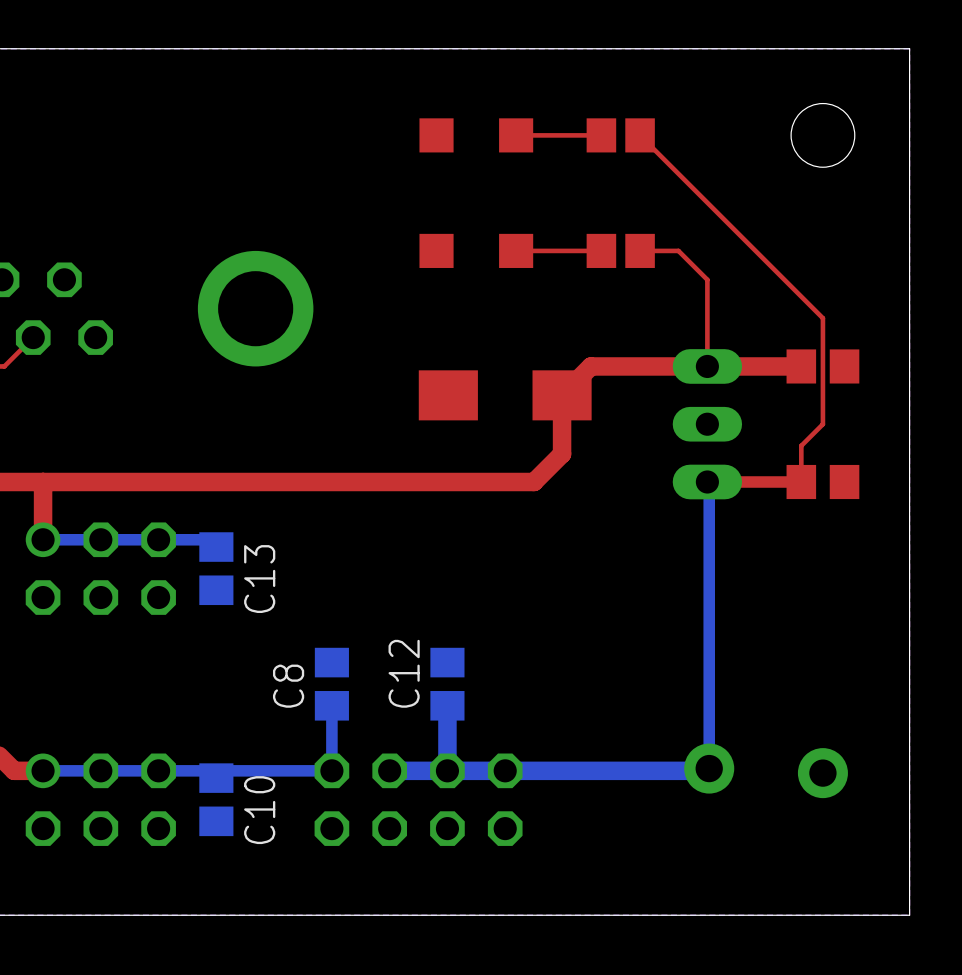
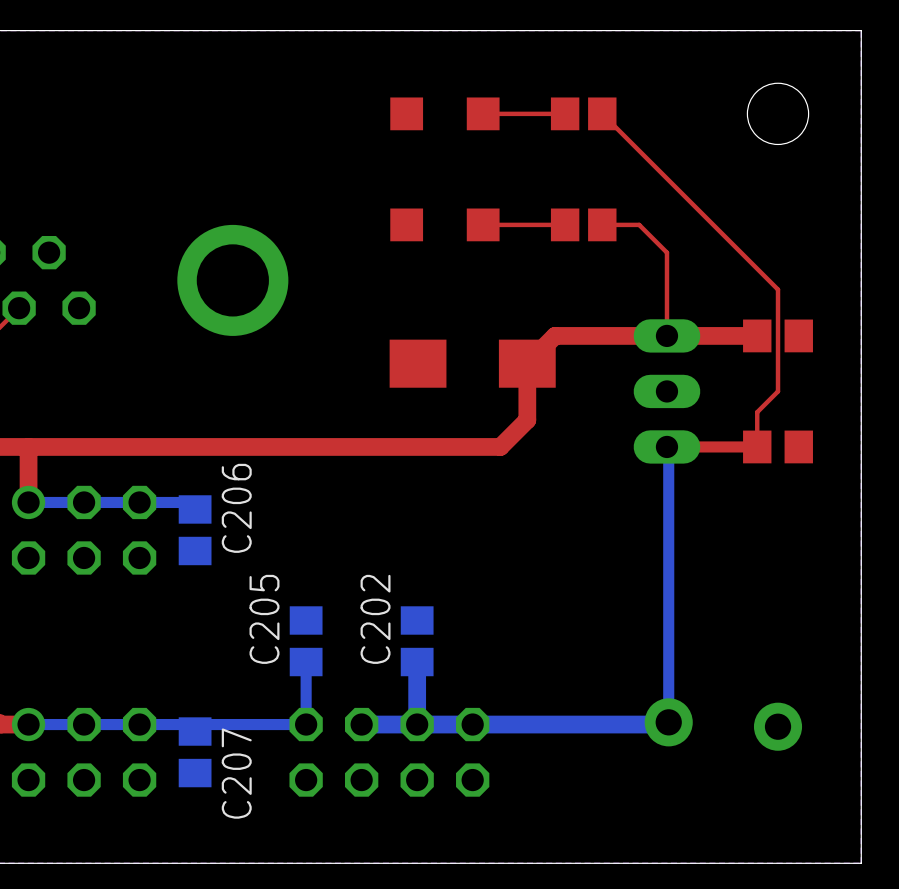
C13 name: C13 (259, 579) -> C206 (236, 508)
C12 name: C12 (404, 673) -> C202 (375, 619)
C8 name: C8 (288, 686) -> C205 (264, 619)
C10 name: C10 (259, 810) -> C207 (236, 773)

